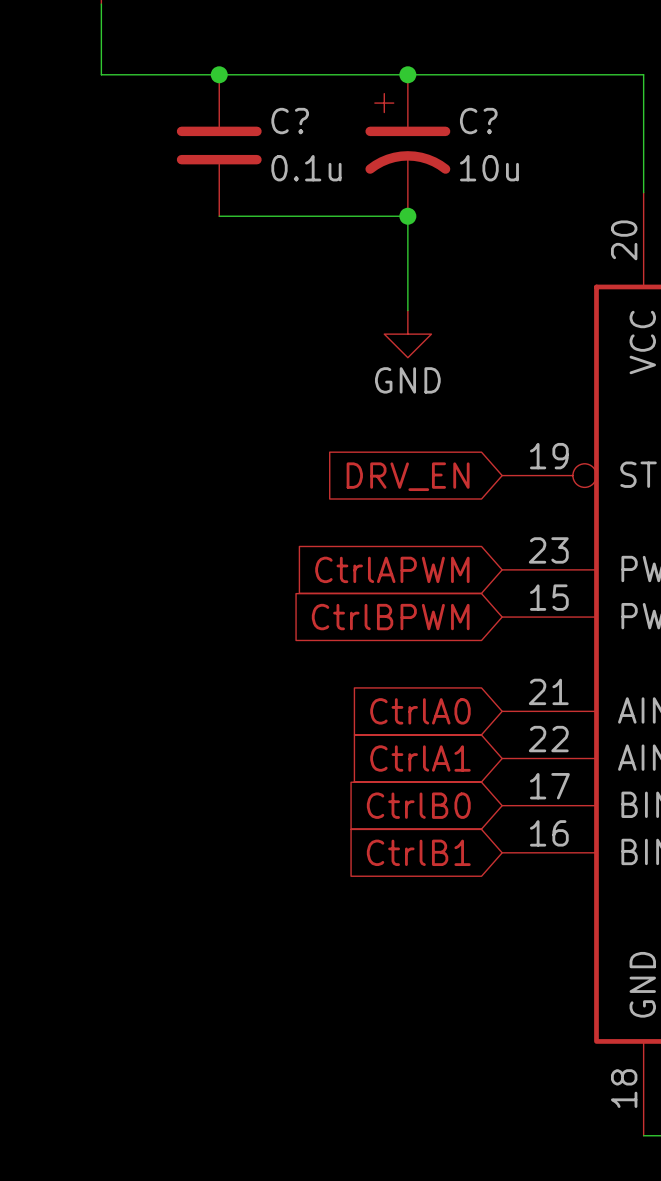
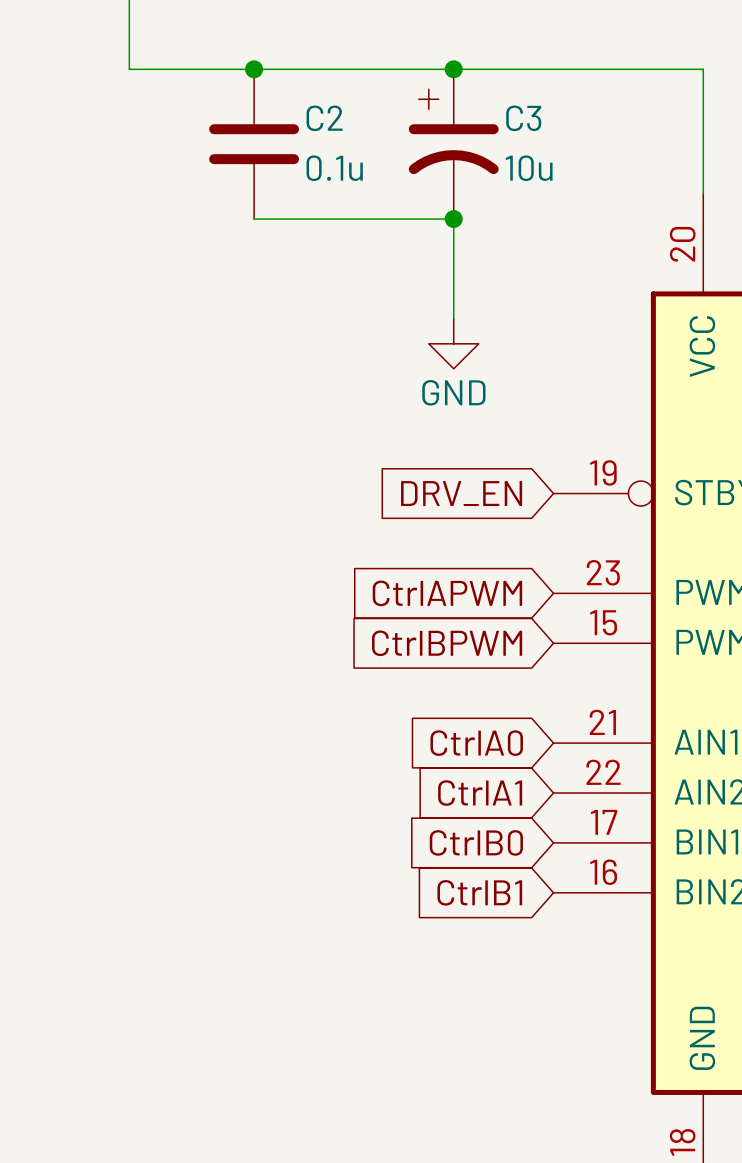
C? name: C? (290, 121) -> C2 (324, 118)
C? name: C? (478, 121) -> C3 (523, 118)

